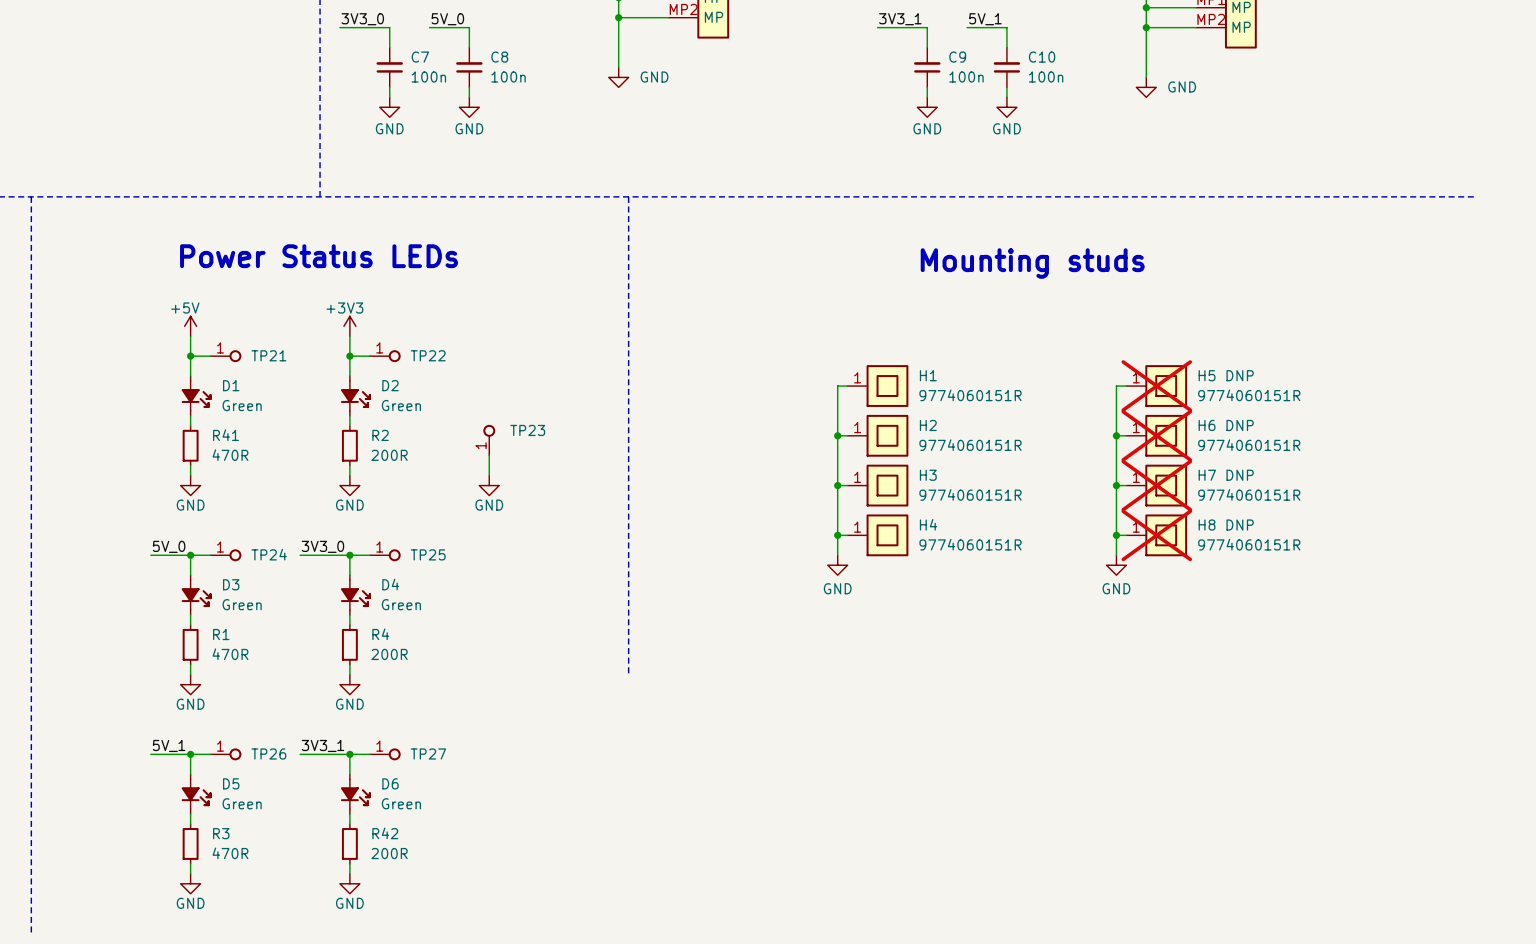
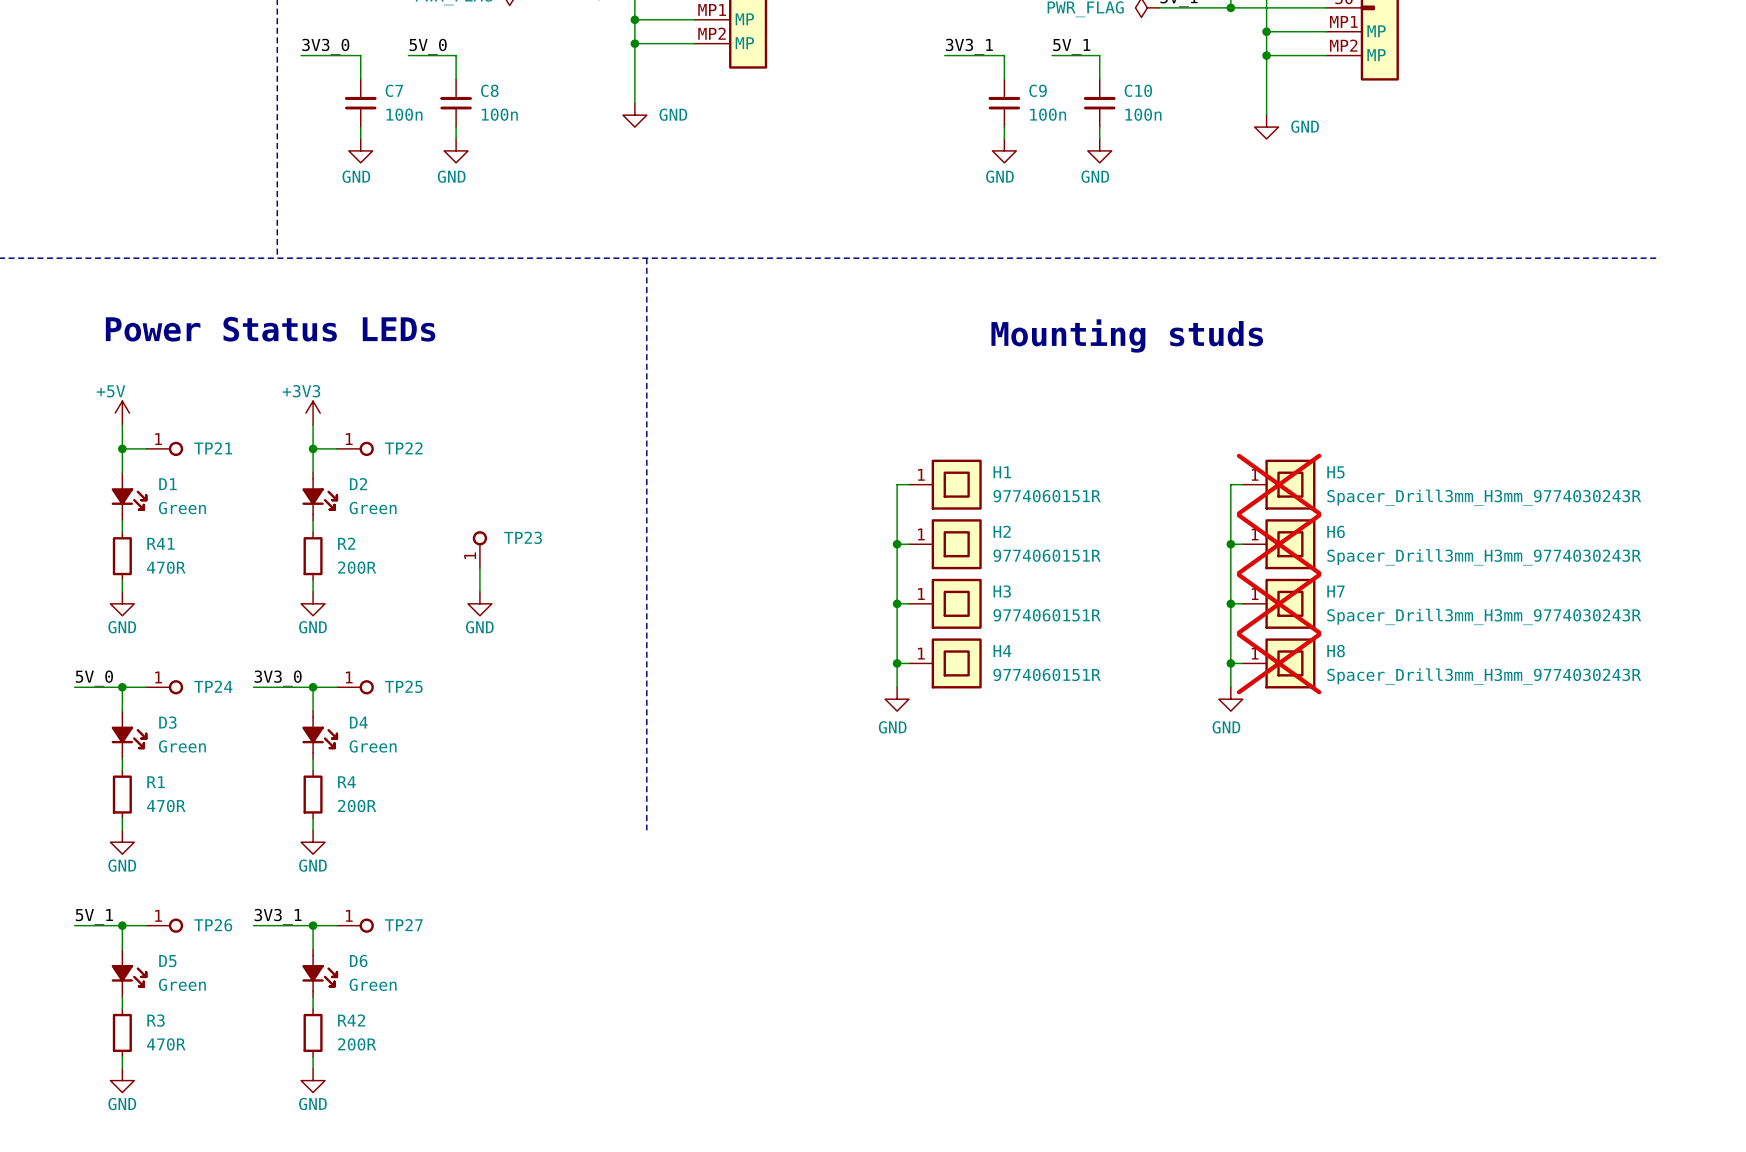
H5 text: DNP (1240, 375) -> none
H5 text: 9774060151R (1249, 395) -> none
H5 value: none -> Spacer_Drill3mm_H3mm_9774030243R (1484, 497)
H6 text: DNP (1240, 425) -> none
H6 text: 9774060151R (1249, 445) -> none
H6 value: none -> Spacer_Drill3mm_H3mm_9774030243R (1484, 557)
H7 text: DNP (1240, 475) -> none
H7 text: 9774060151R (1249, 494) -> none
H7 value: none -> Spacer_Drill3mm_H3mm_9774030243R (1484, 616)
H8 text: DNP (1240, 525) -> none
H8 text: 9774060151R (1249, 544) -> none
H8 value: none -> Spacer_Drill3mm_H3mm_9774030243R (1484, 676)

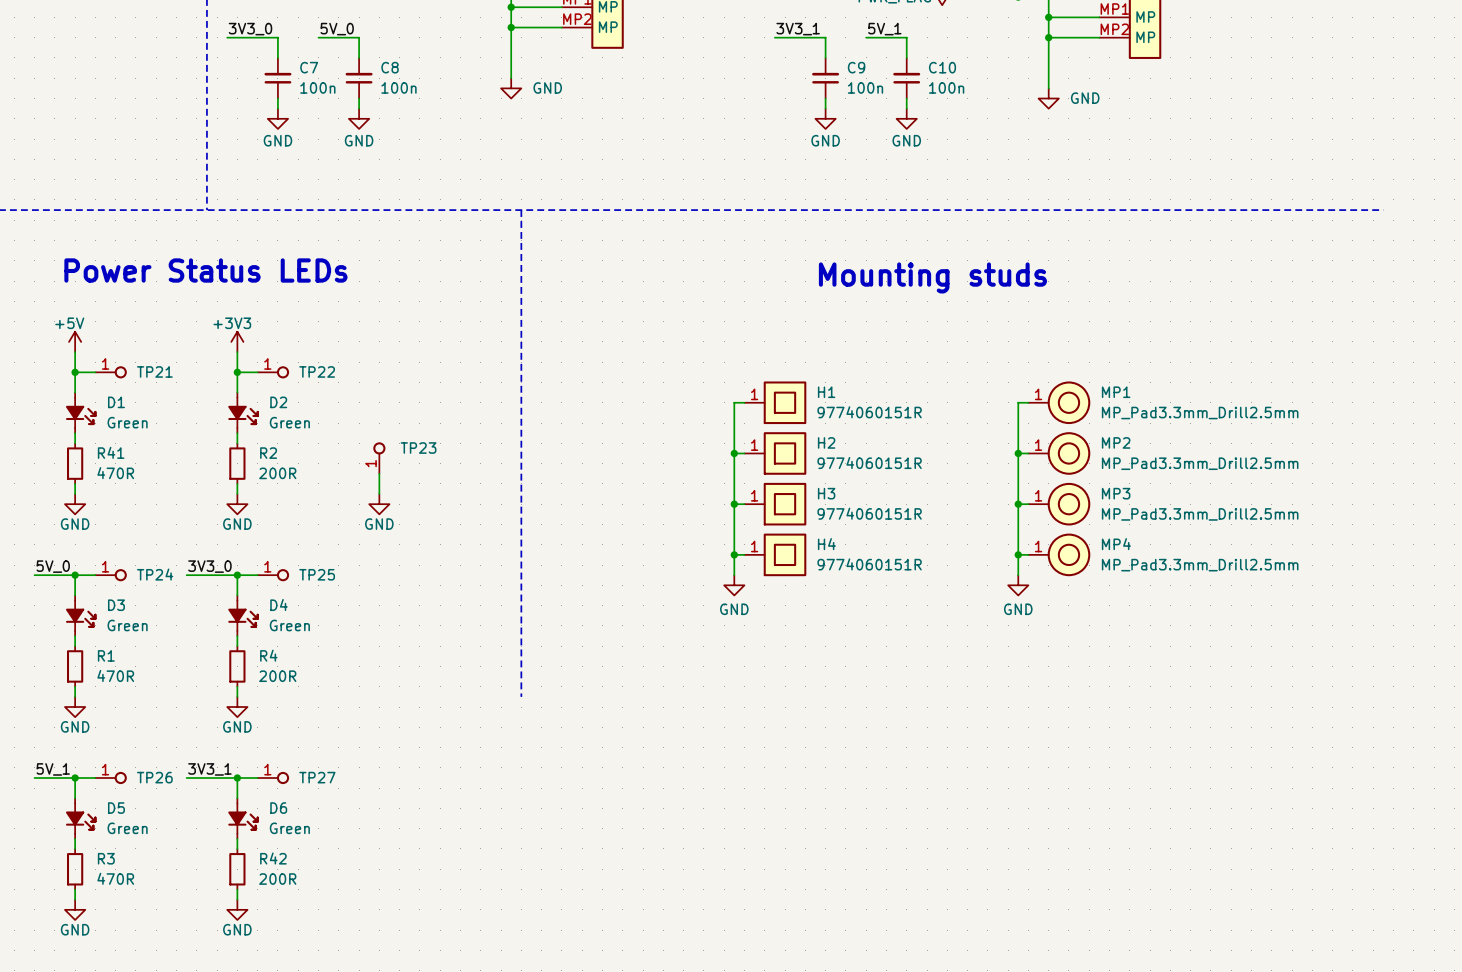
H5: Spacer_Drill3mm_H3mm_9774030243R (1279, 484) -> none
MP1: none -> MP_Pad3.3mm_Drill2.5mm (1059, 402)
H6: Spacer_Drill3mm_H3mm_9774030243R (1279, 544) -> none
MP2: none -> MP_Pad3.3mm_Drill2.5mm (1059, 453)
H7: Spacer_Drill3mm_H3mm_9774030243R (1279, 603) -> none
MP3: none -> MP_Pad3.3mm_Drill2.5mm (1059, 504)
H8: Spacer_Drill3mm_H3mm_9774030243R (1279, 663) -> none
MP4: none -> MP_Pad3.3mm_Drill2.5mm (1059, 554)

